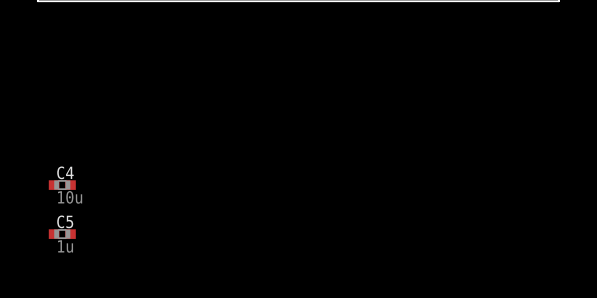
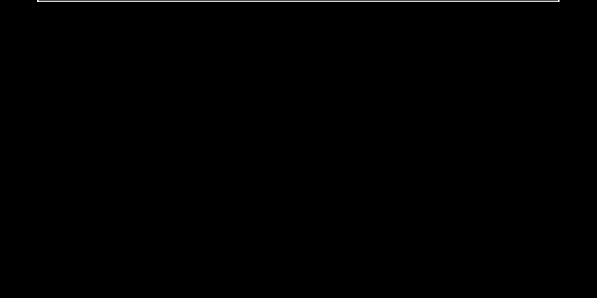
C4: 10u (62, 185) -> none
C5: 1u (62, 234) -> none

